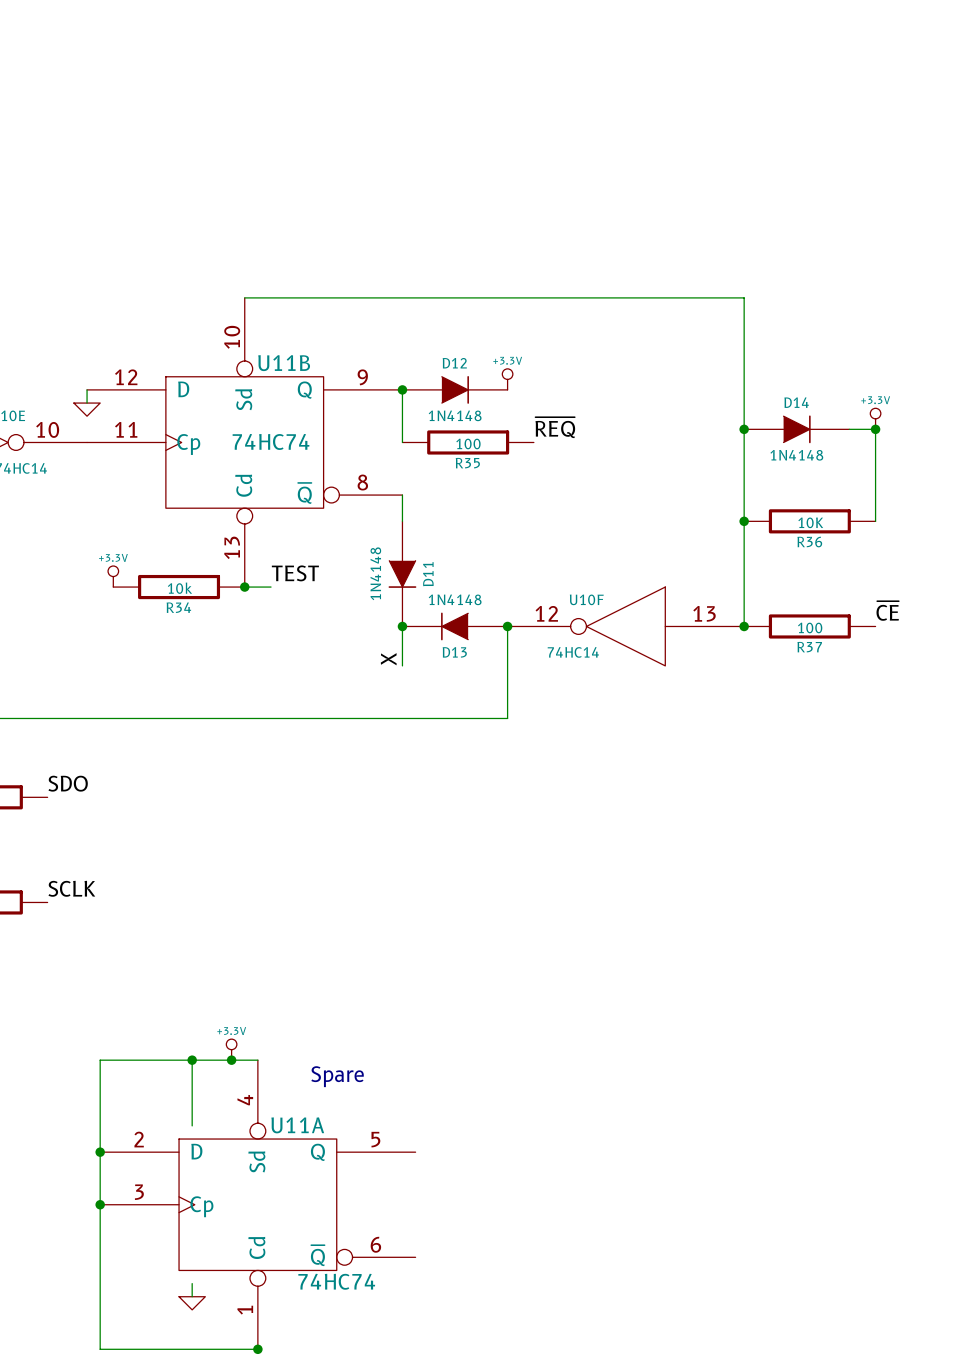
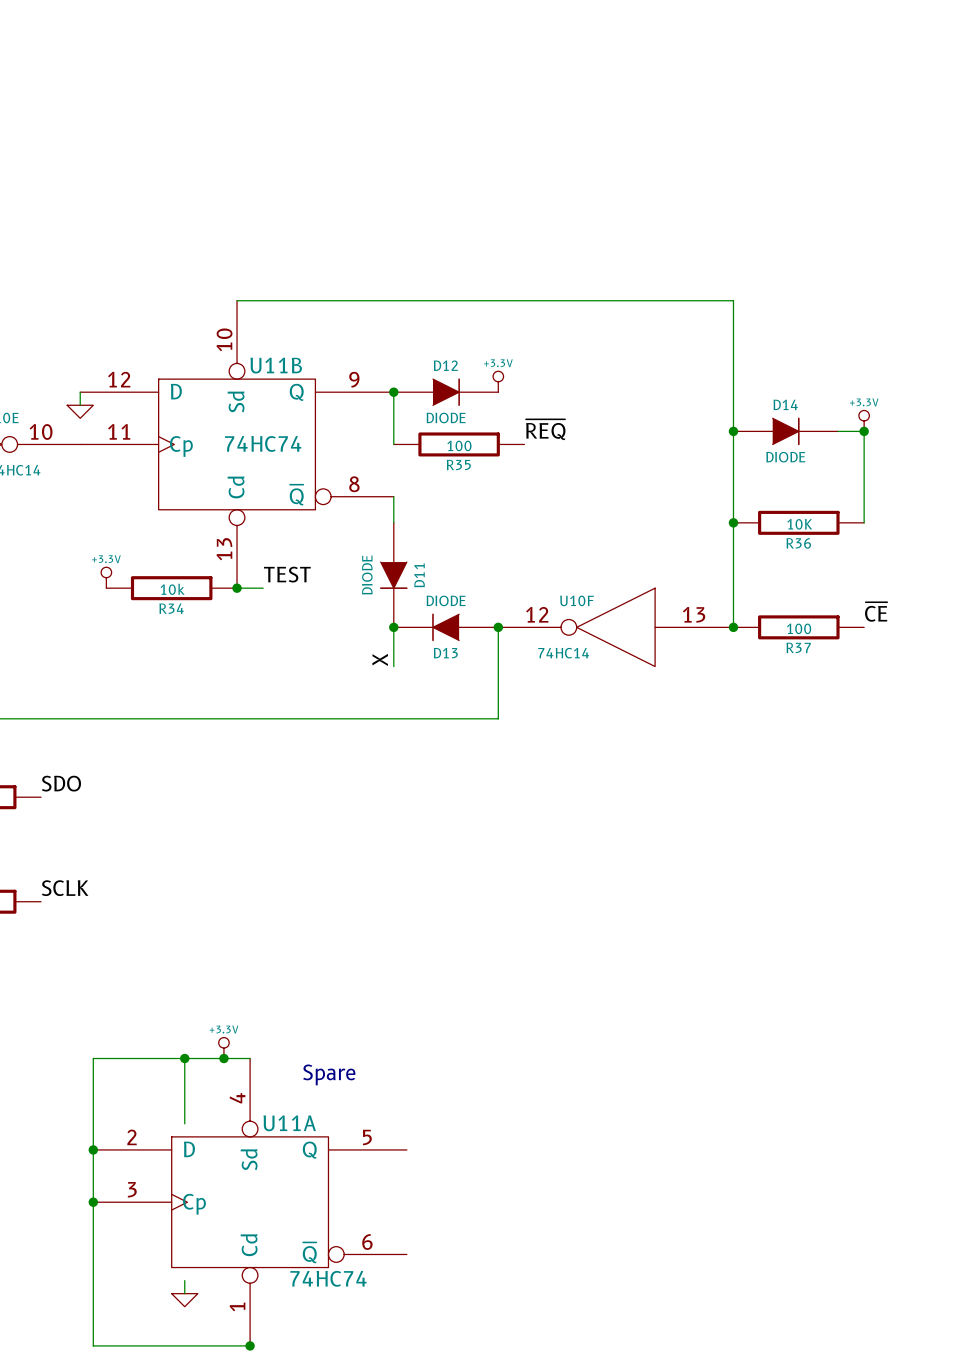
D12 value: 1N4148 (455, 415) -> DIODE (446, 417)
D14 value: 1N4148 (796, 455) -> DIODE (785, 457)
D11 value: 1N4148 (375, 573) -> DIODE (367, 575)
D13 value: 1N4148 (455, 599) -> DIODE (446, 600)

